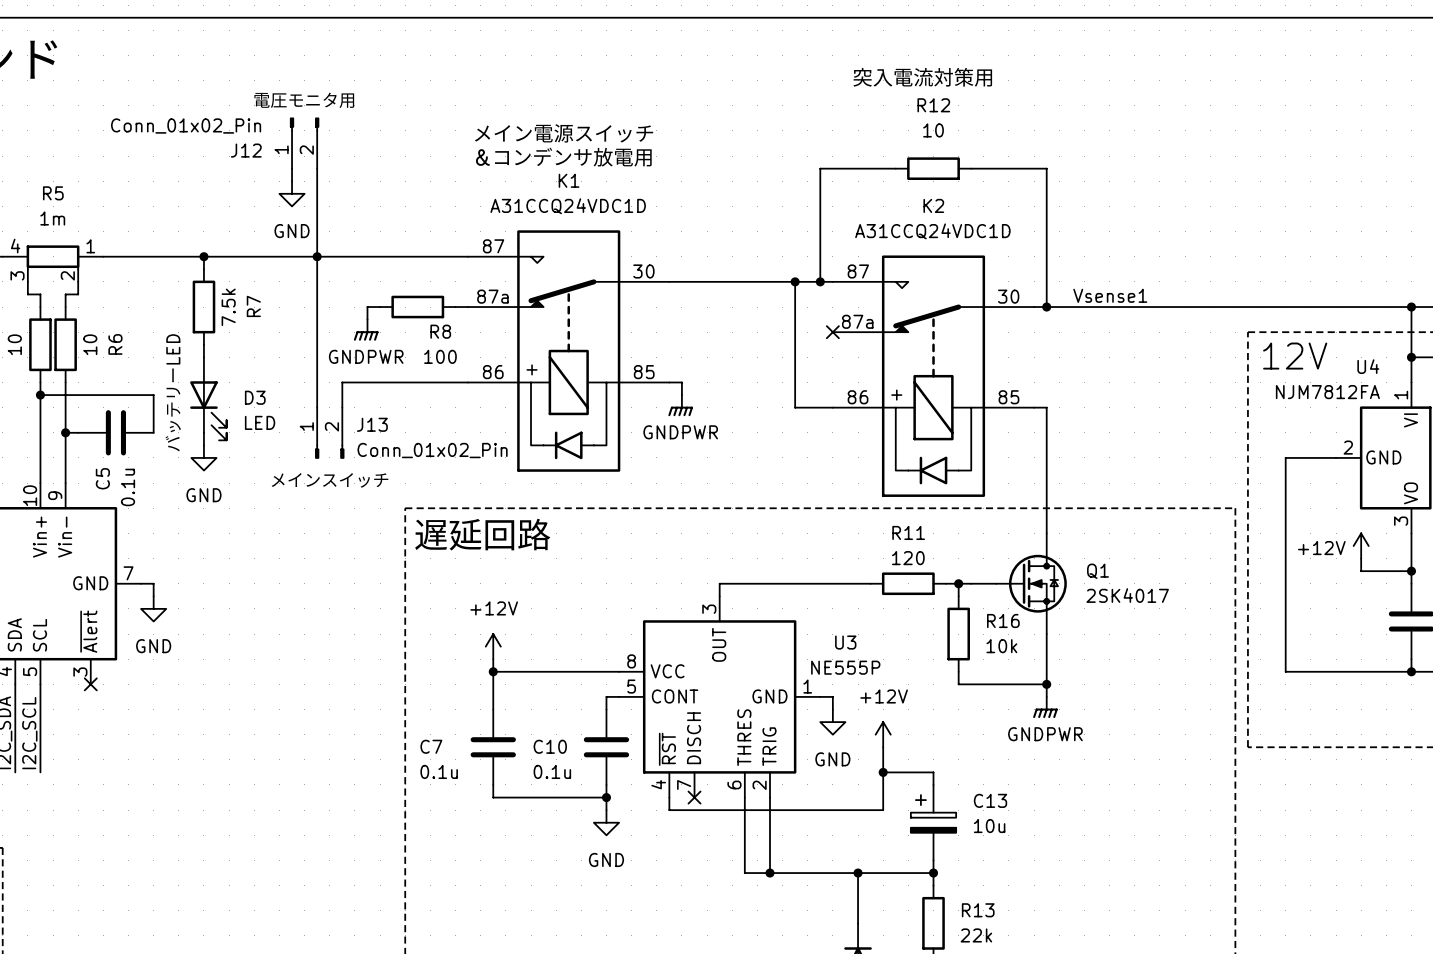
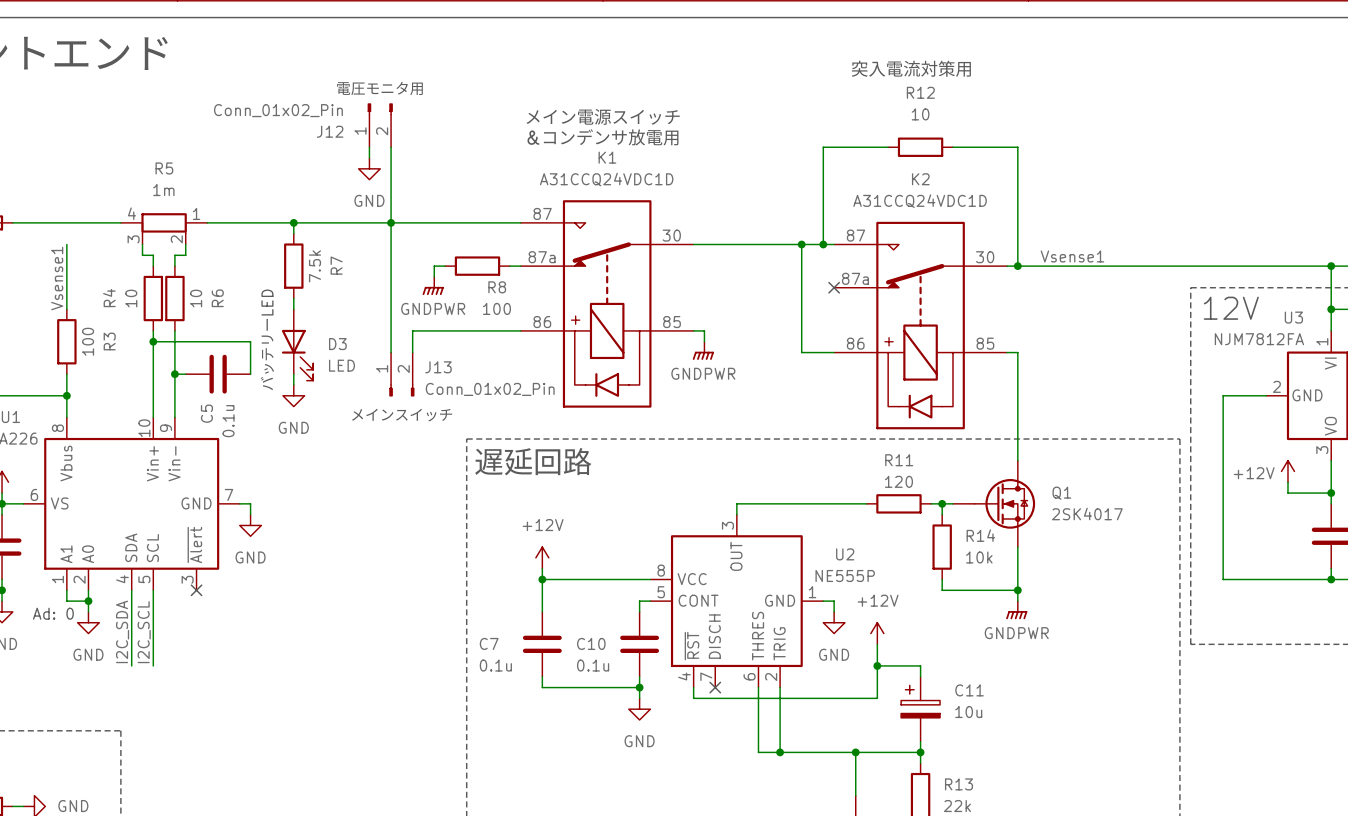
U4 name: U4 (1368, 366) -> U3 (1293, 317)
R16 name: R16 (1003, 621) -> R14 (980, 535)
U3 name: U3 (845, 642) -> U2 (845, 554)
C13 name: C13 (990, 800) -> C11 (969, 690)

